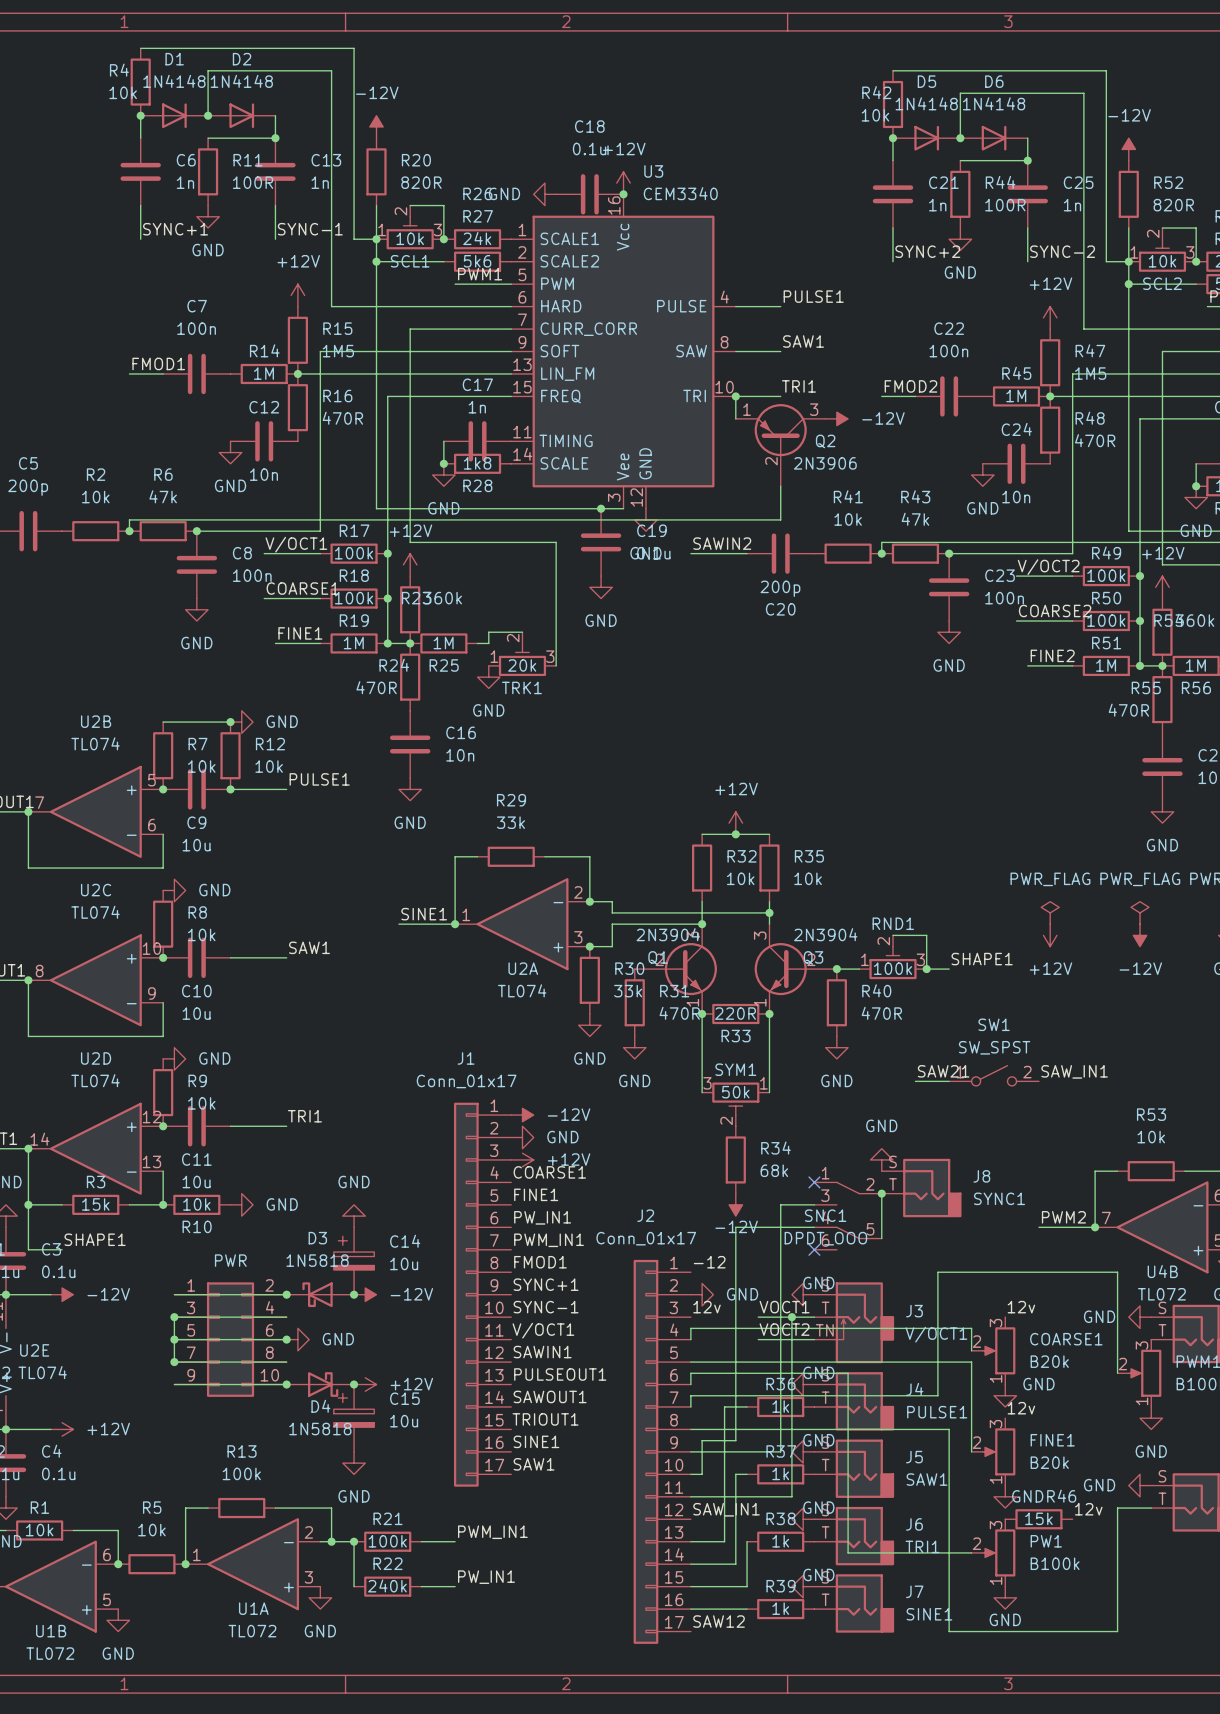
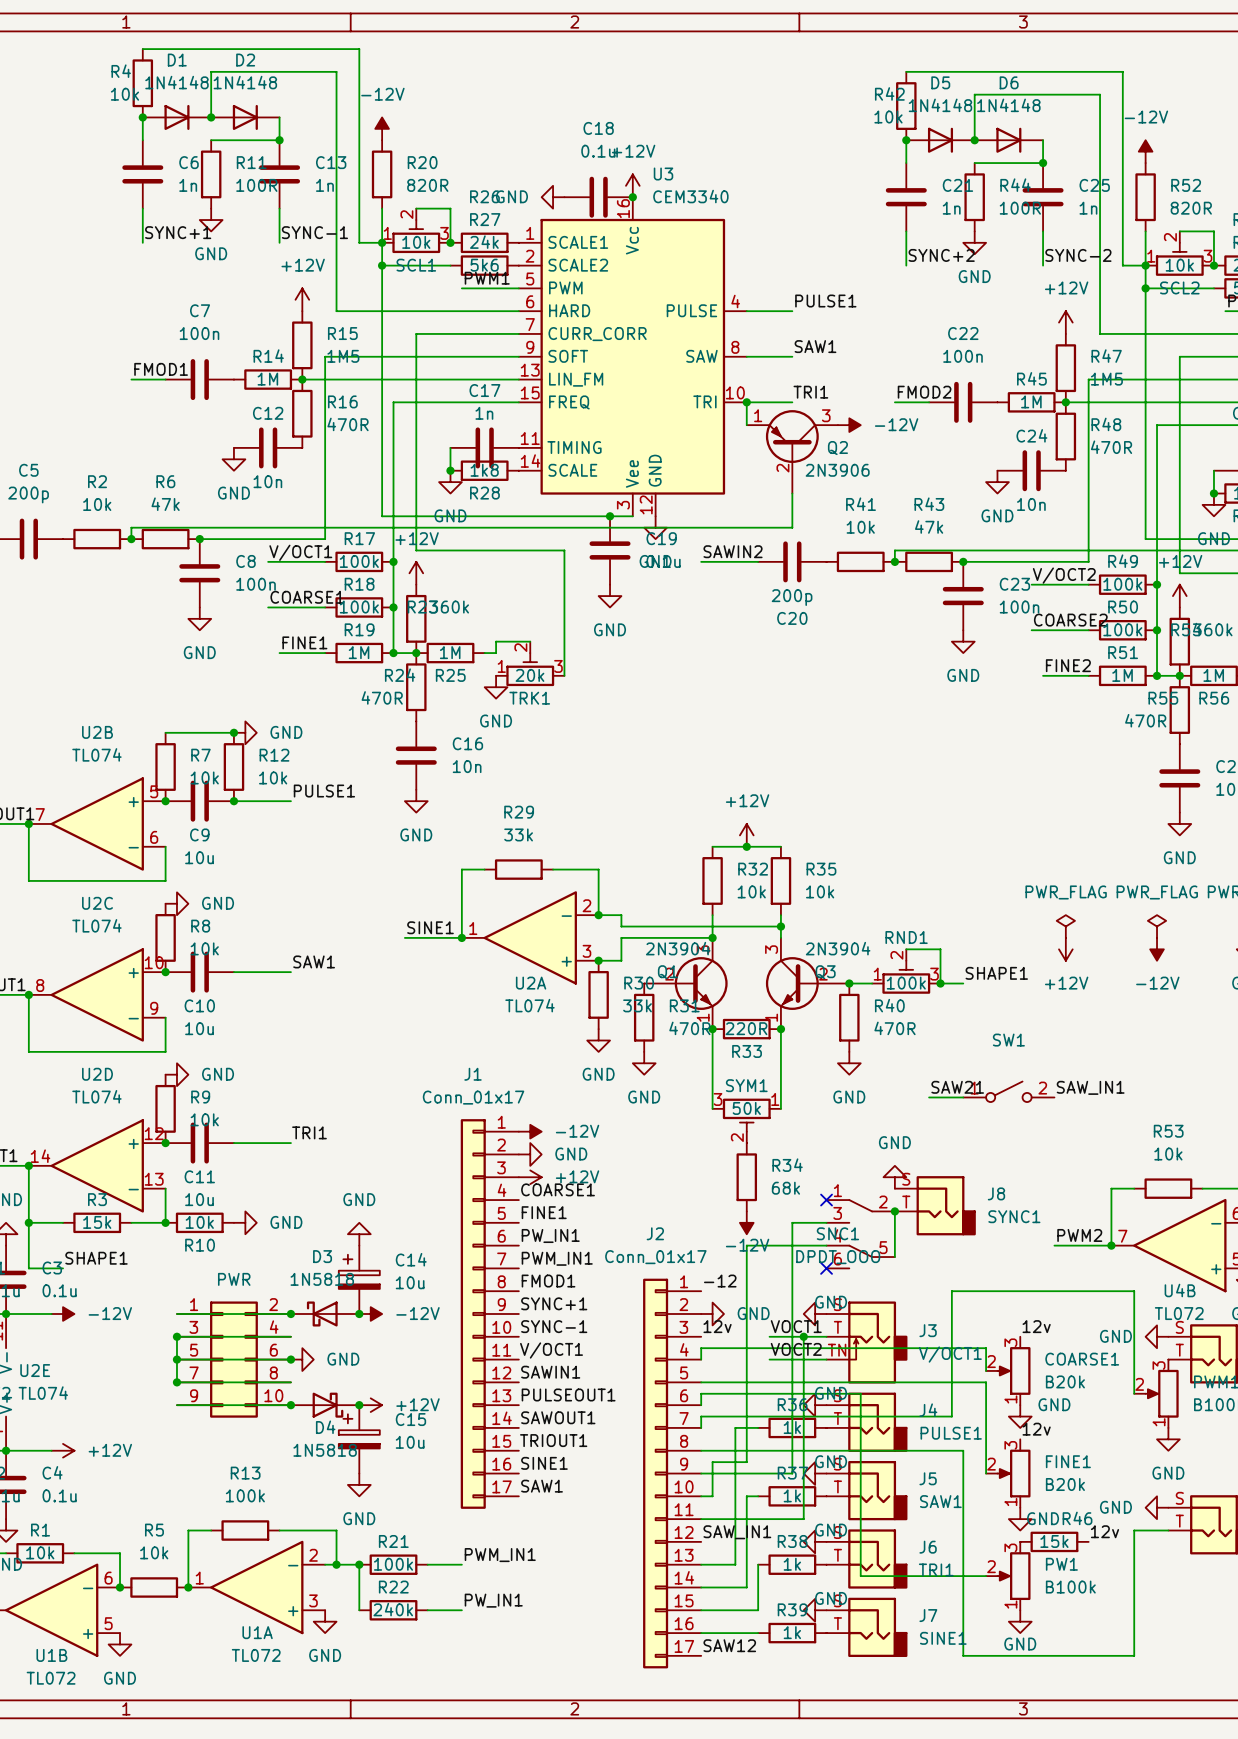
SW1 value: SW_SPST (994, 1047) -> none

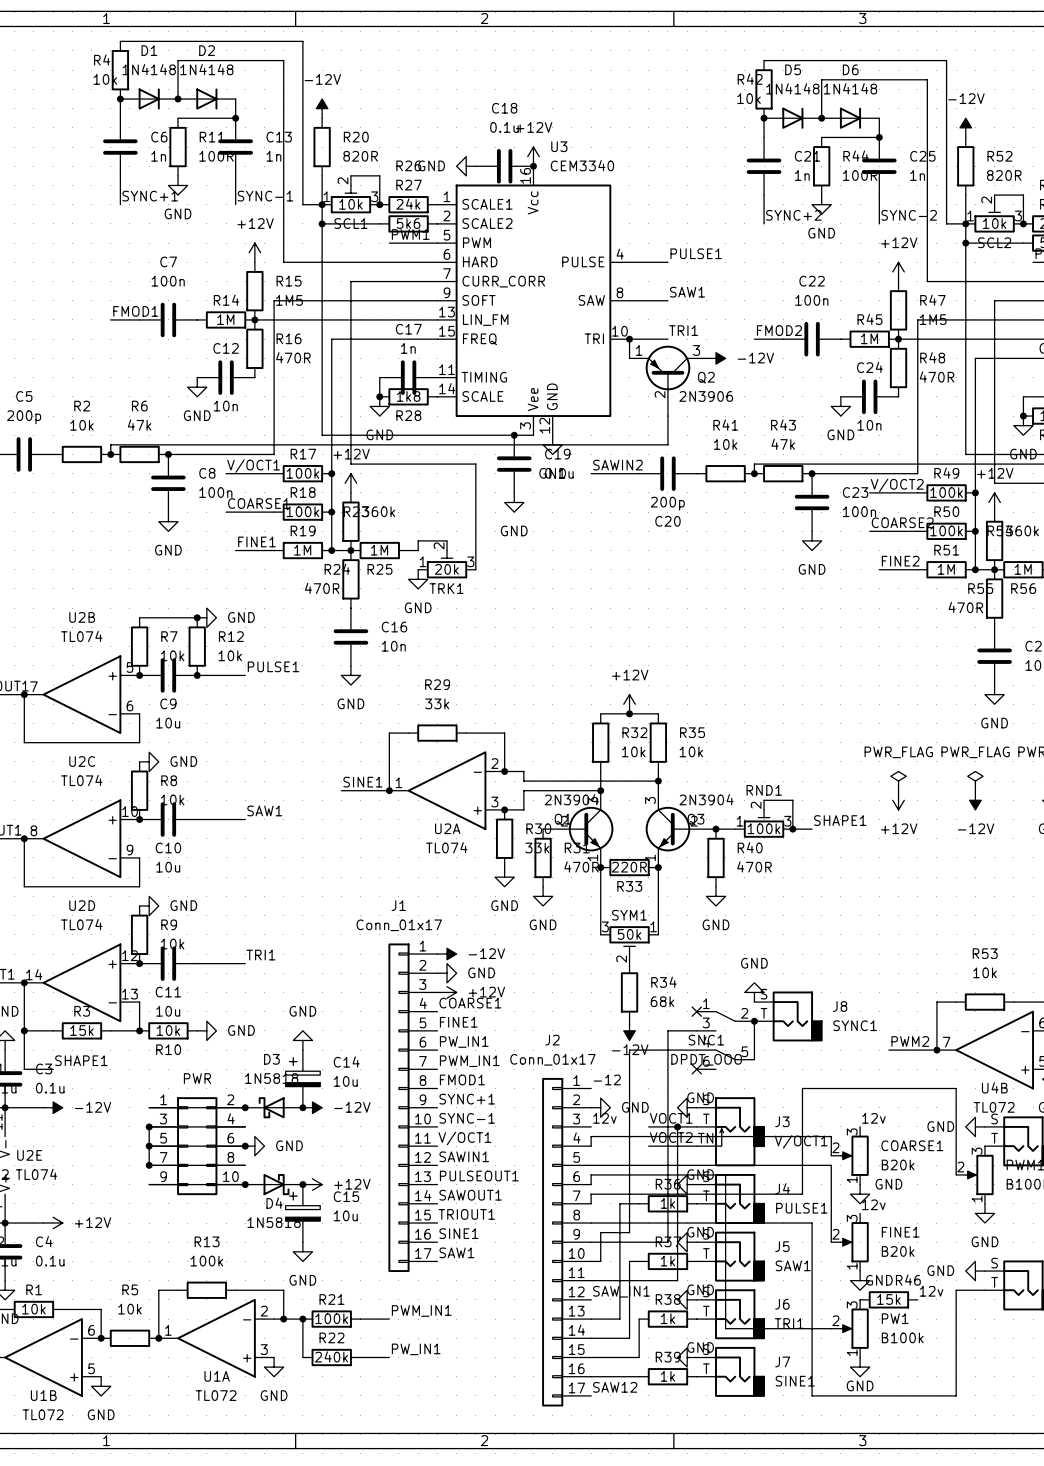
label: SAW21 (957, 1087) -> none
label: SAW_IN1 (1090, 1087) -> none
SW1: (1008, 1091) -> none
wire: (929, 1097) (963, 1097) -> none

